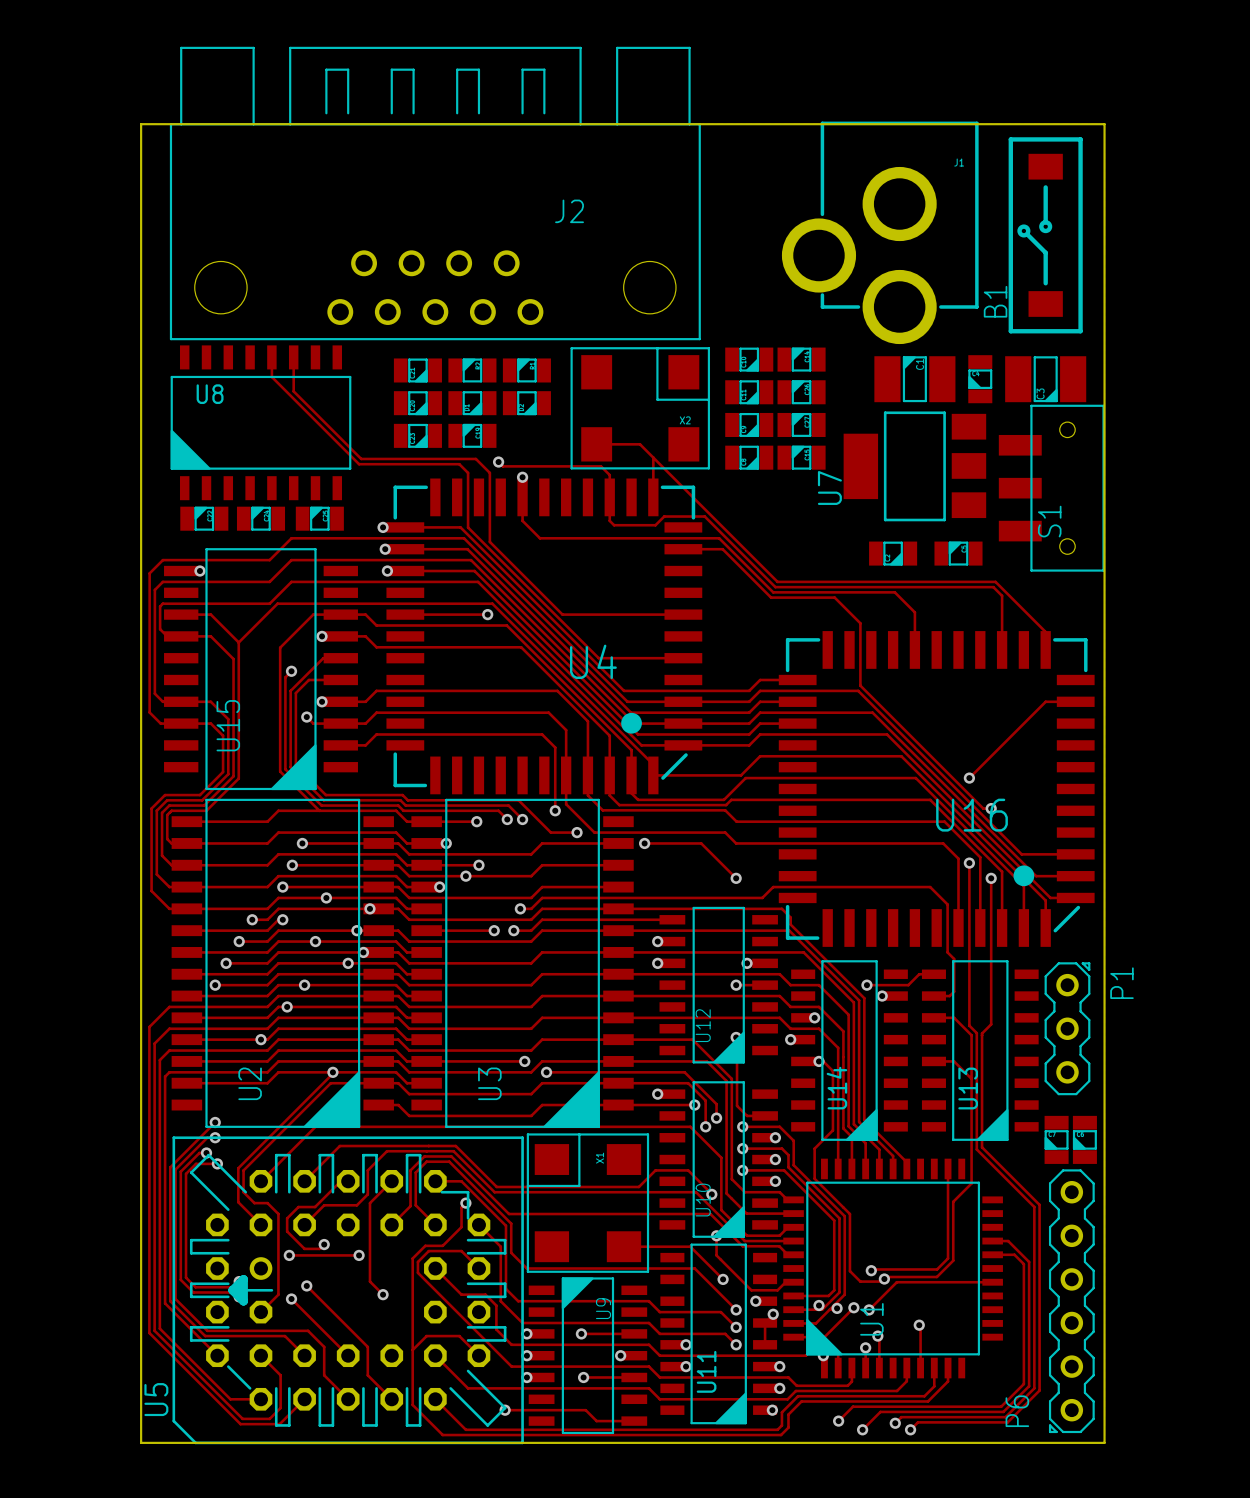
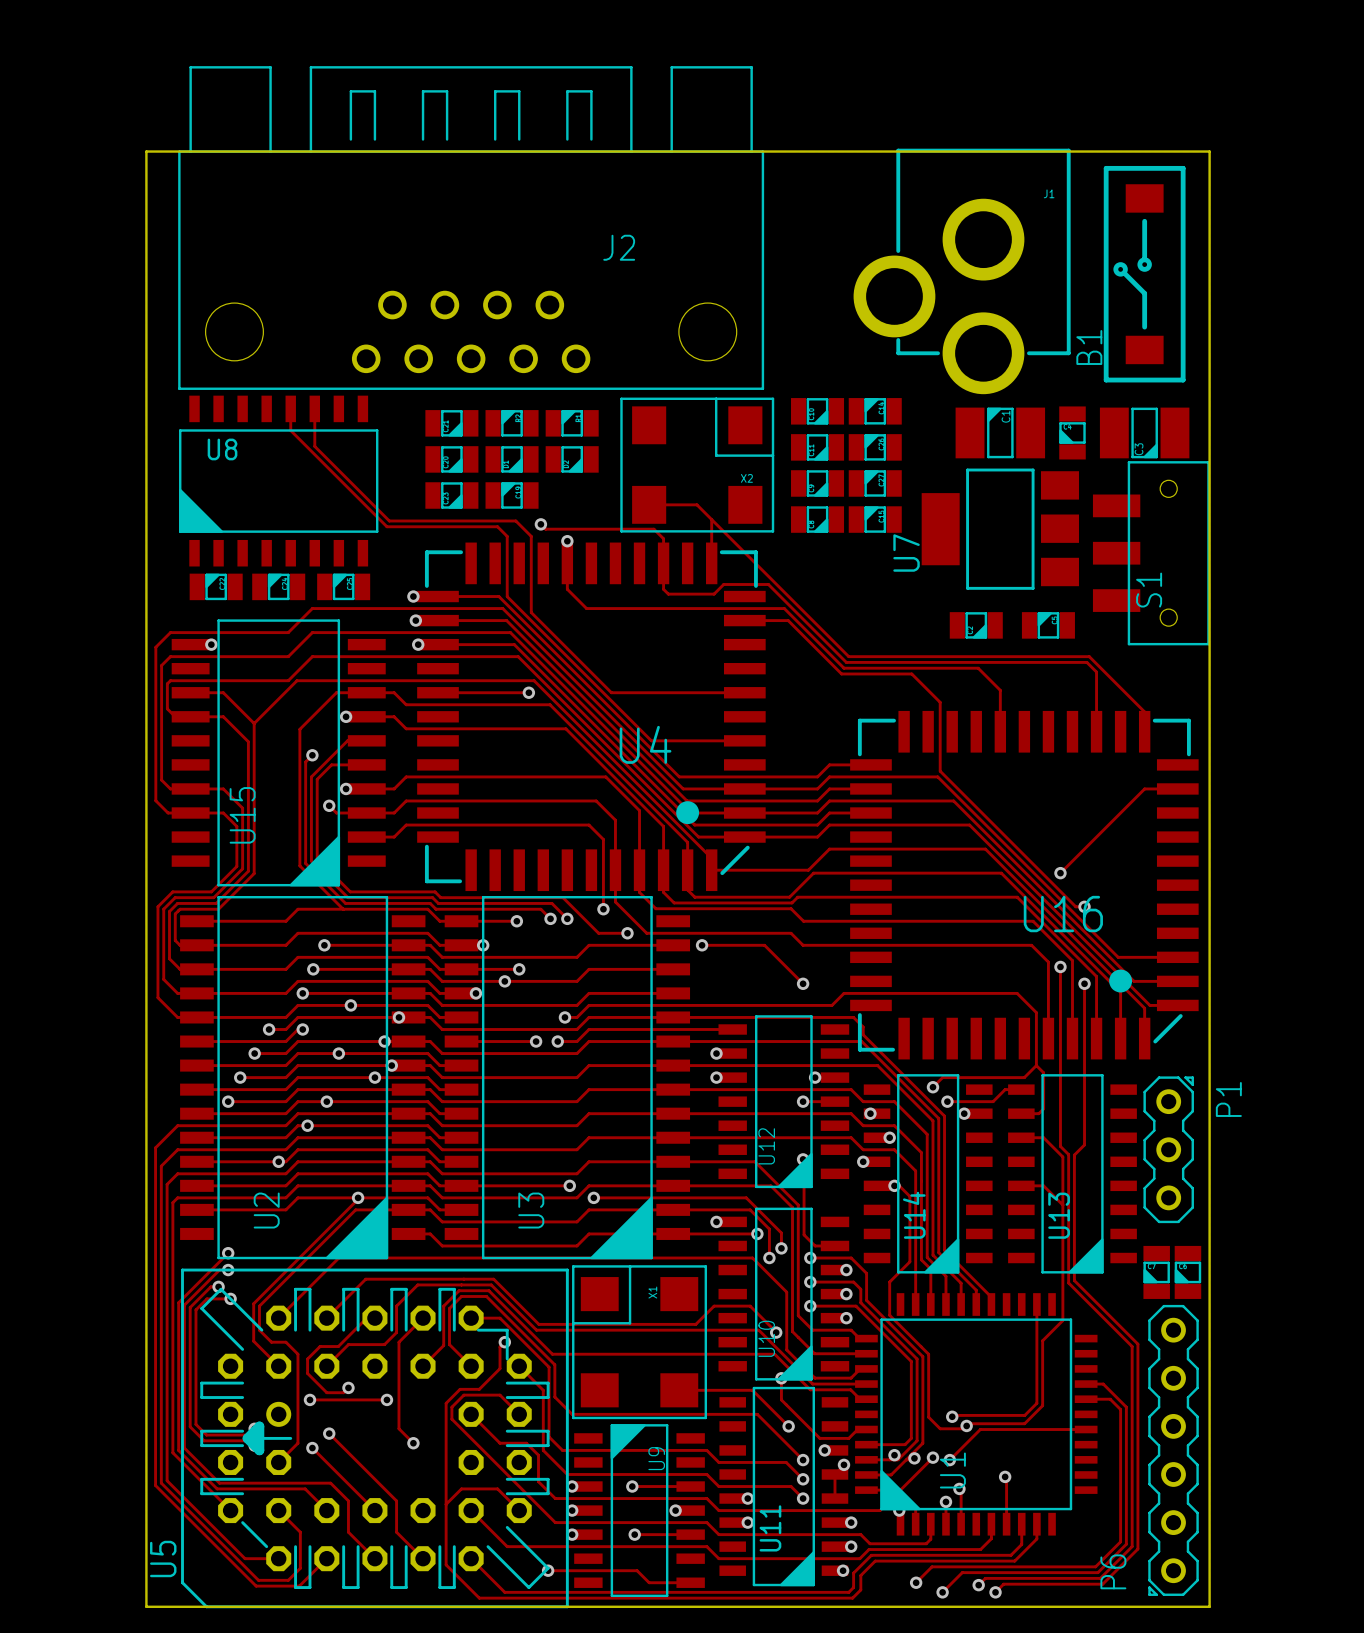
track: none -> (1036, 1065) (1024, 1077) (942, 1077) (932, 1087)
via: none -> (932, 1087)
via: none -> (870, 1113)

